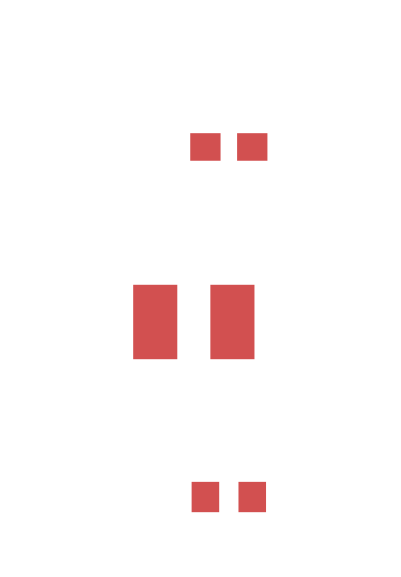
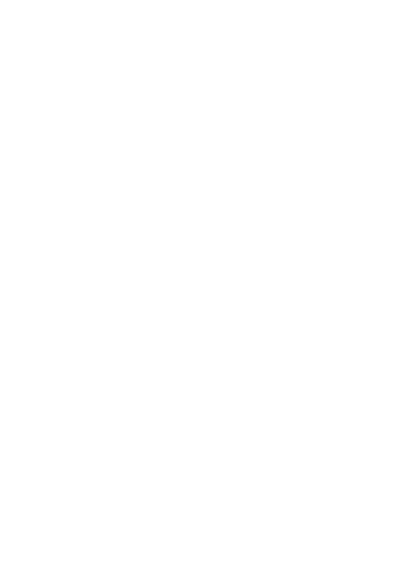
part: (228, 146) -> none
part: (193, 321) -> none
part: (228, 497) -> none

